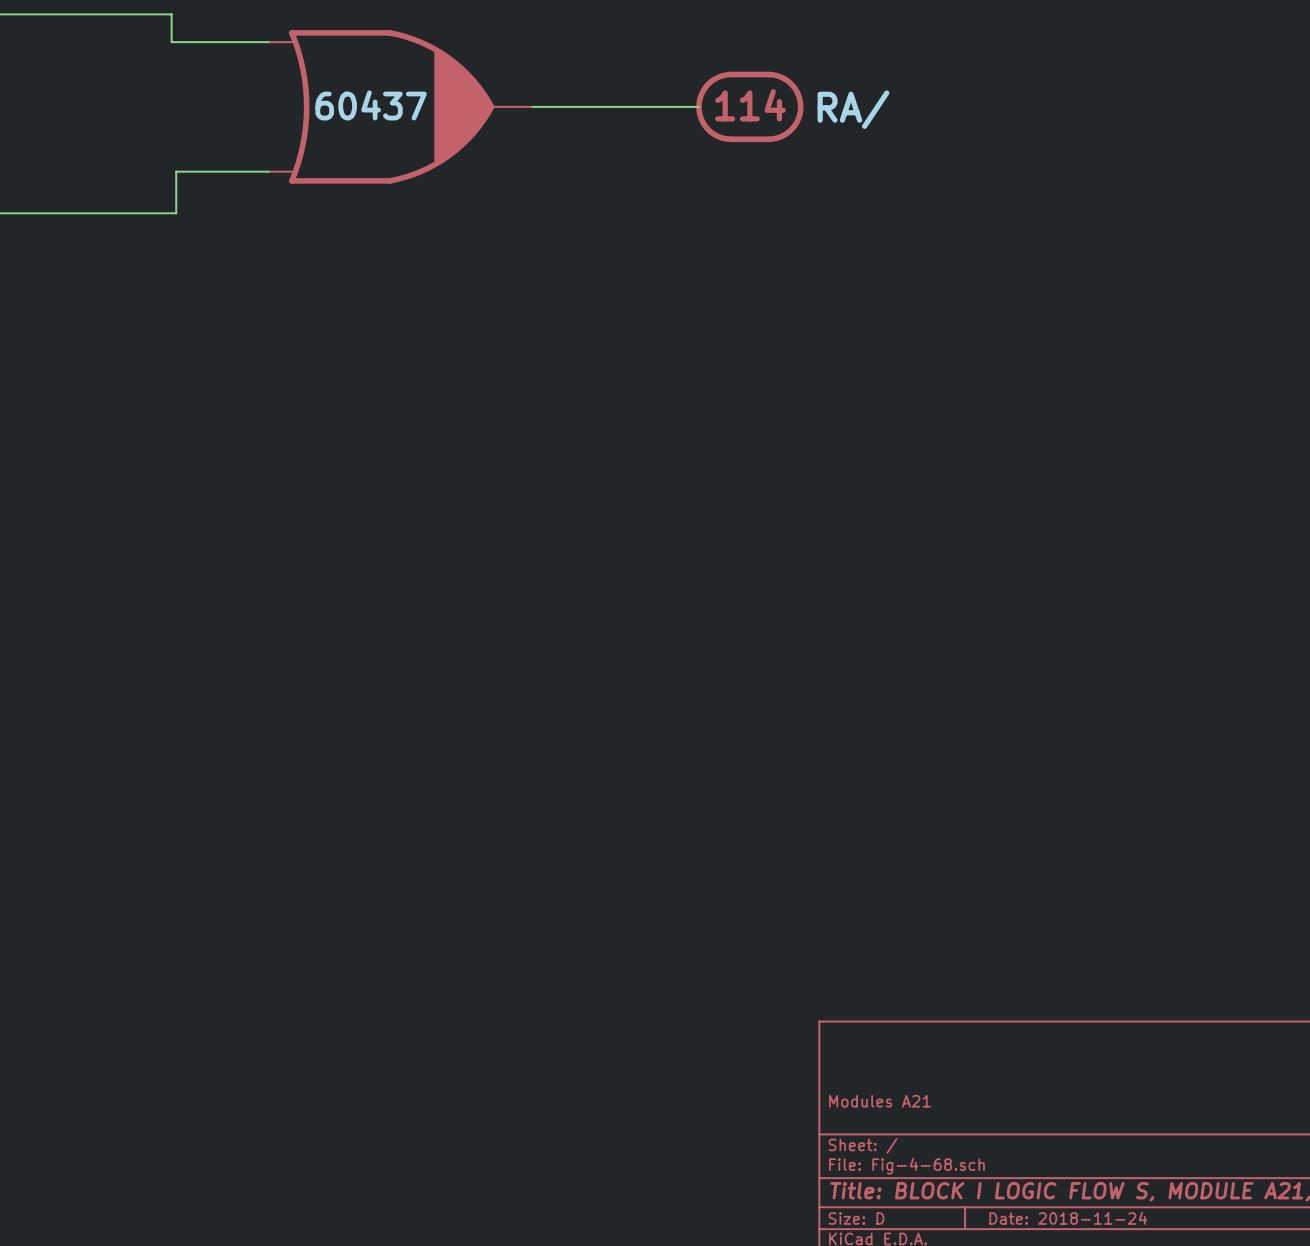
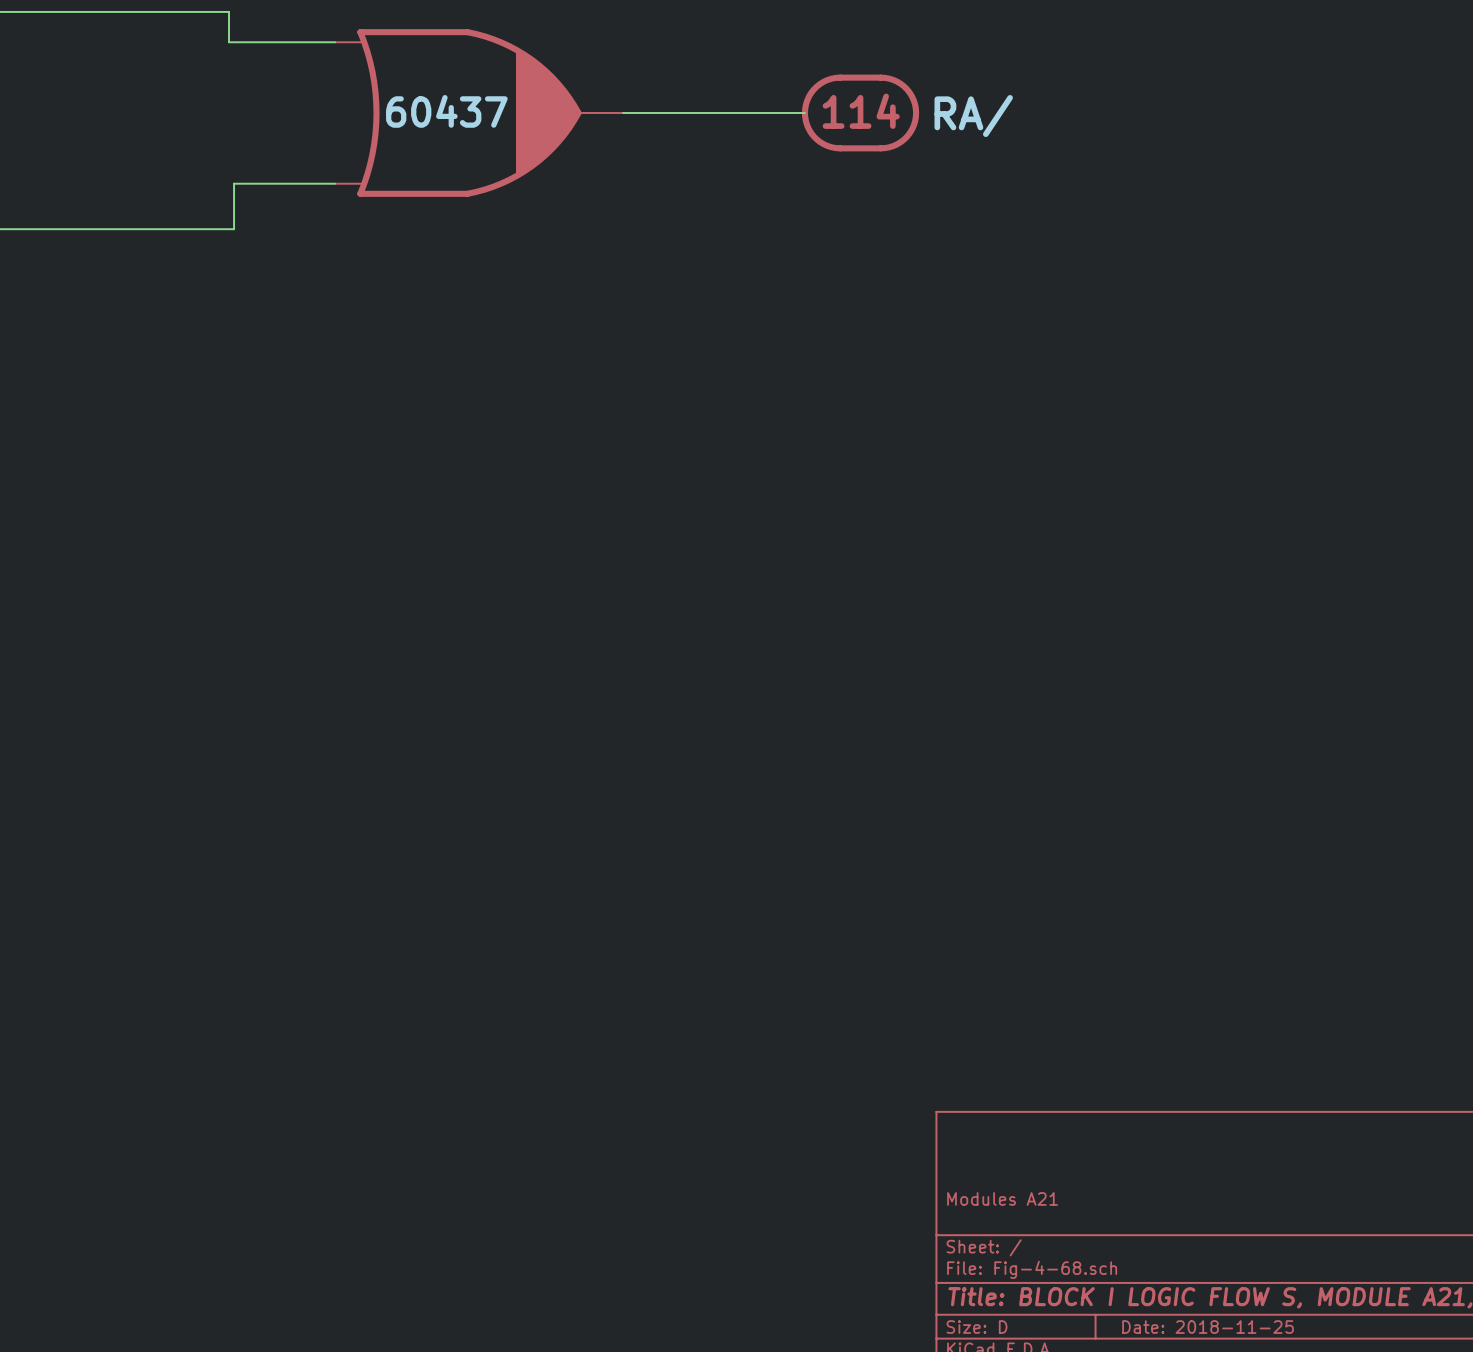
title block: Date: 2018-11-24 (1068, 1218) -> Date: 2018-11-25 (1208, 1327)

